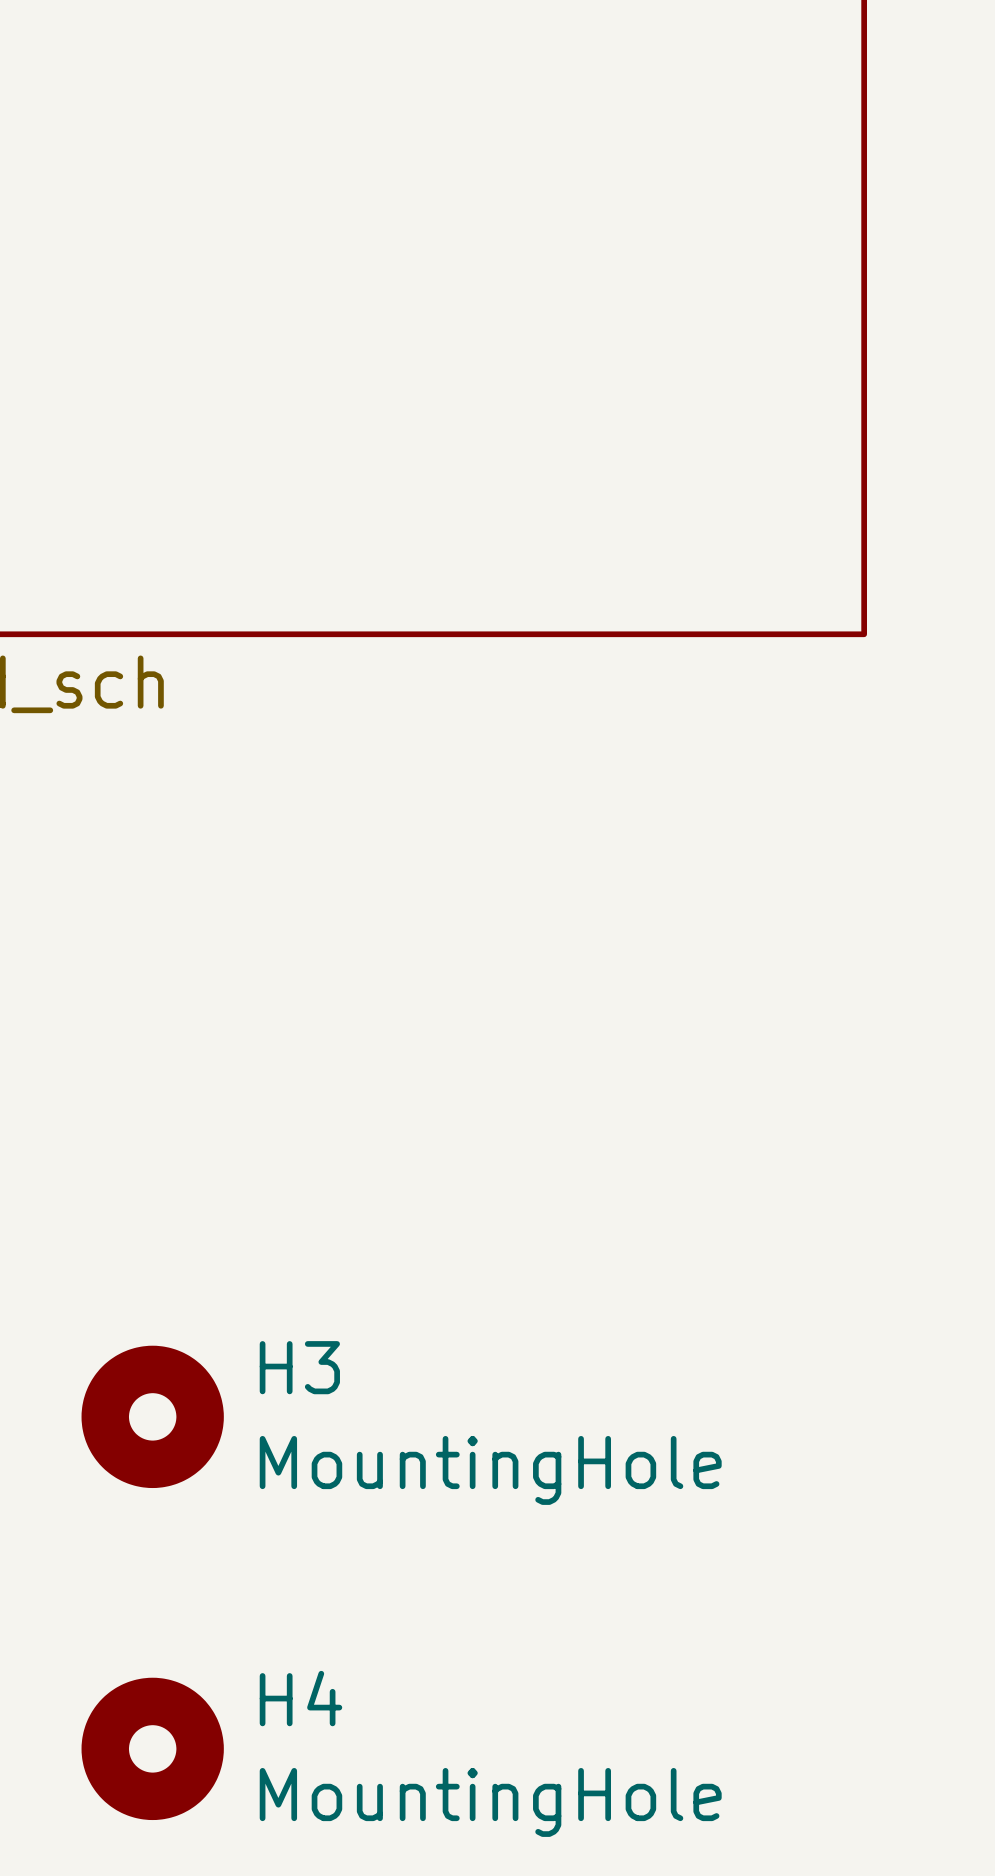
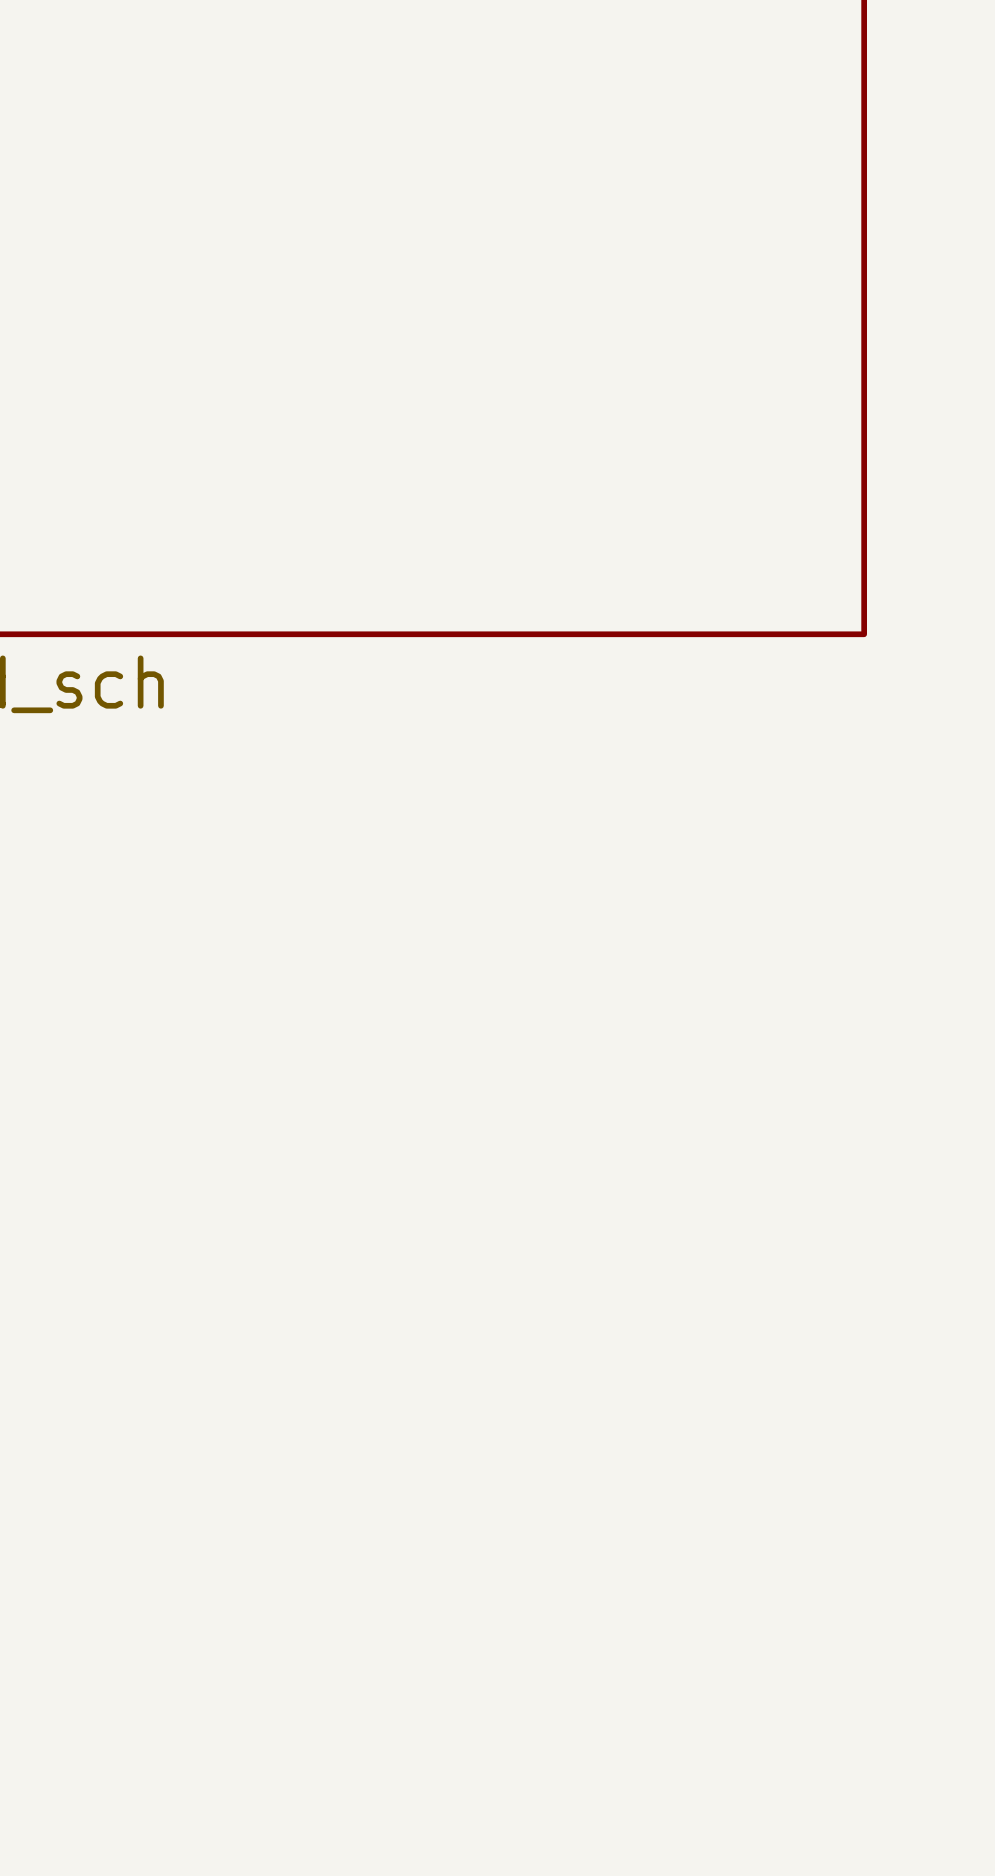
H3: MountingHole (152, 1416) -> none
H4: MountingHole (152, 1748) -> none

